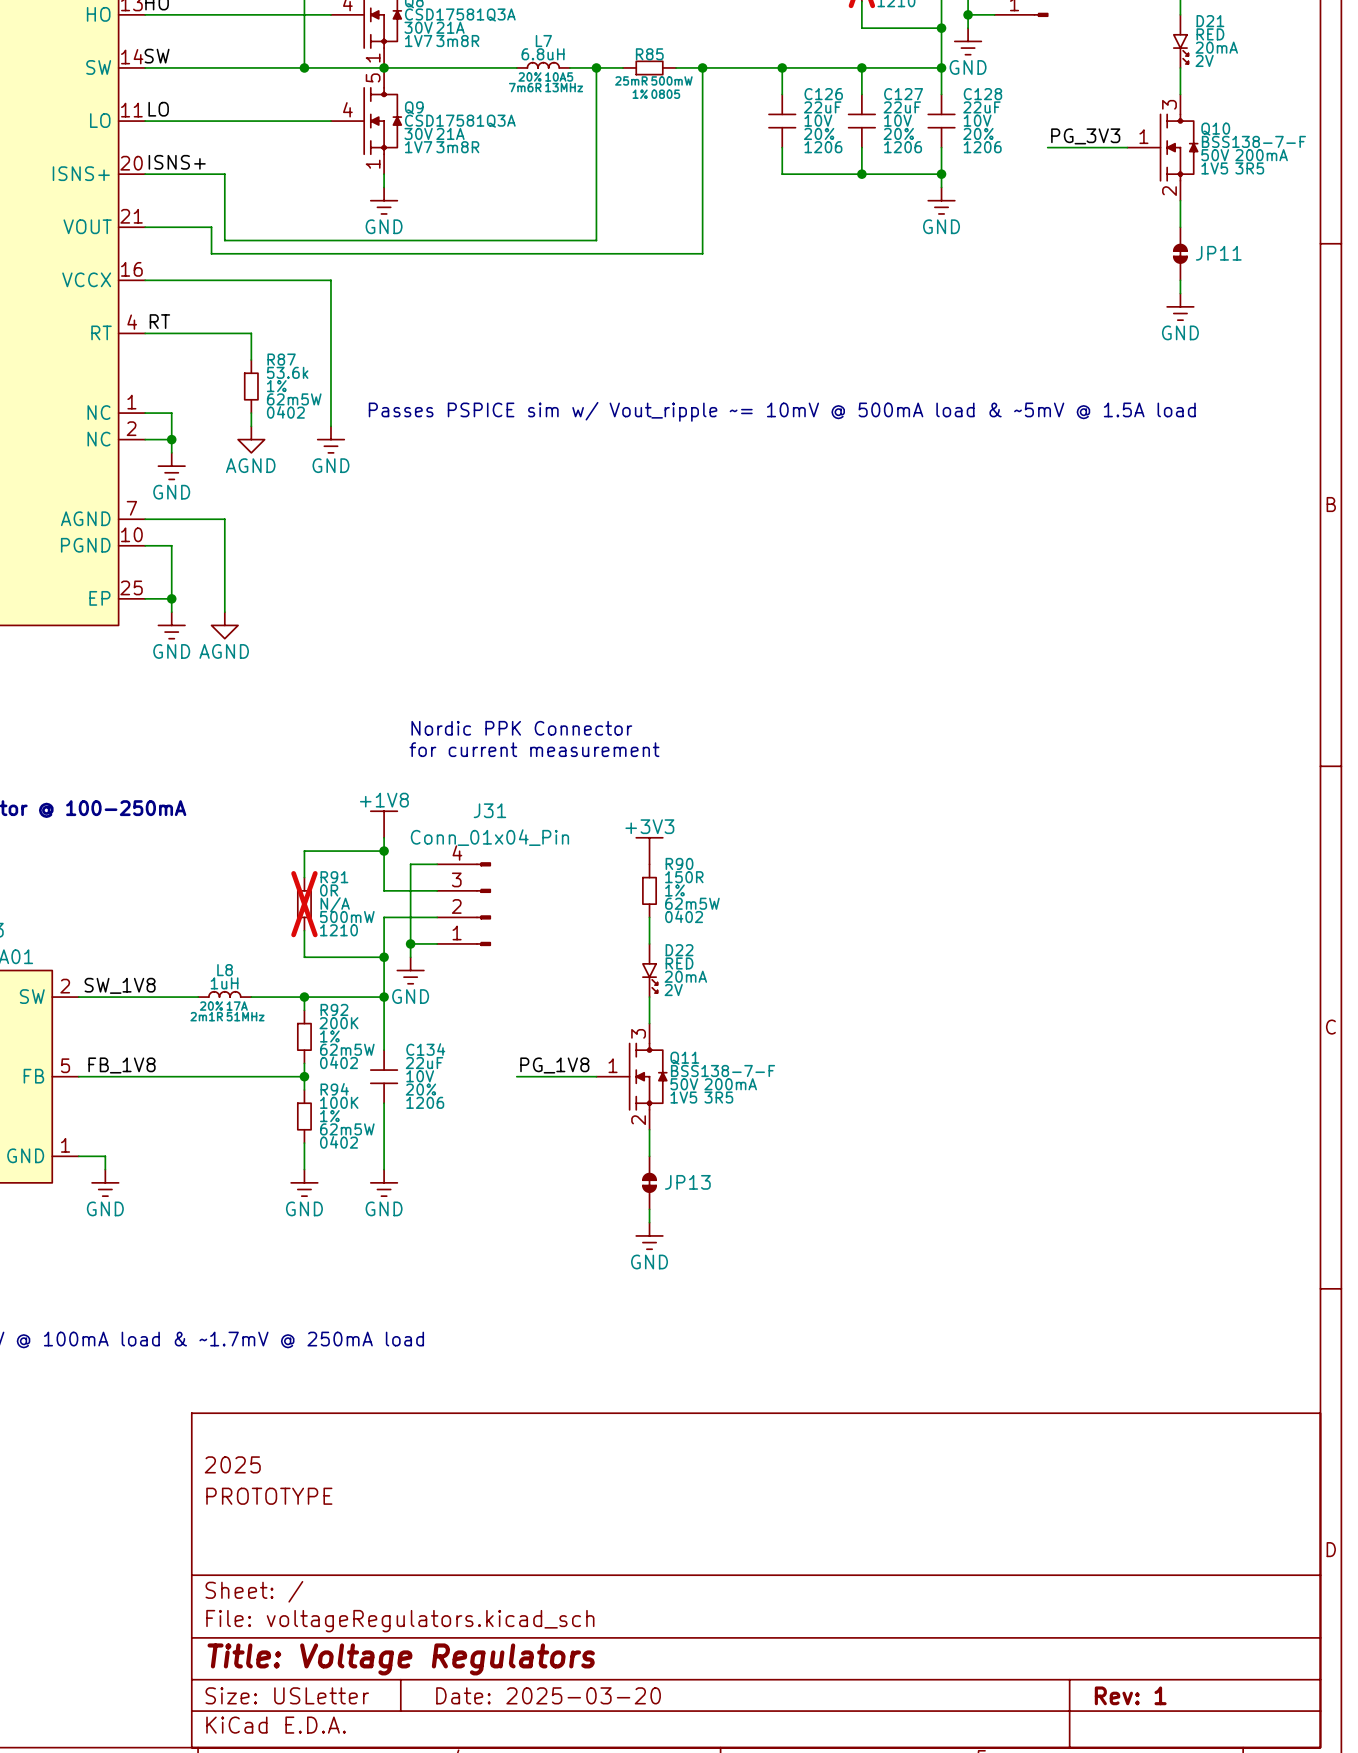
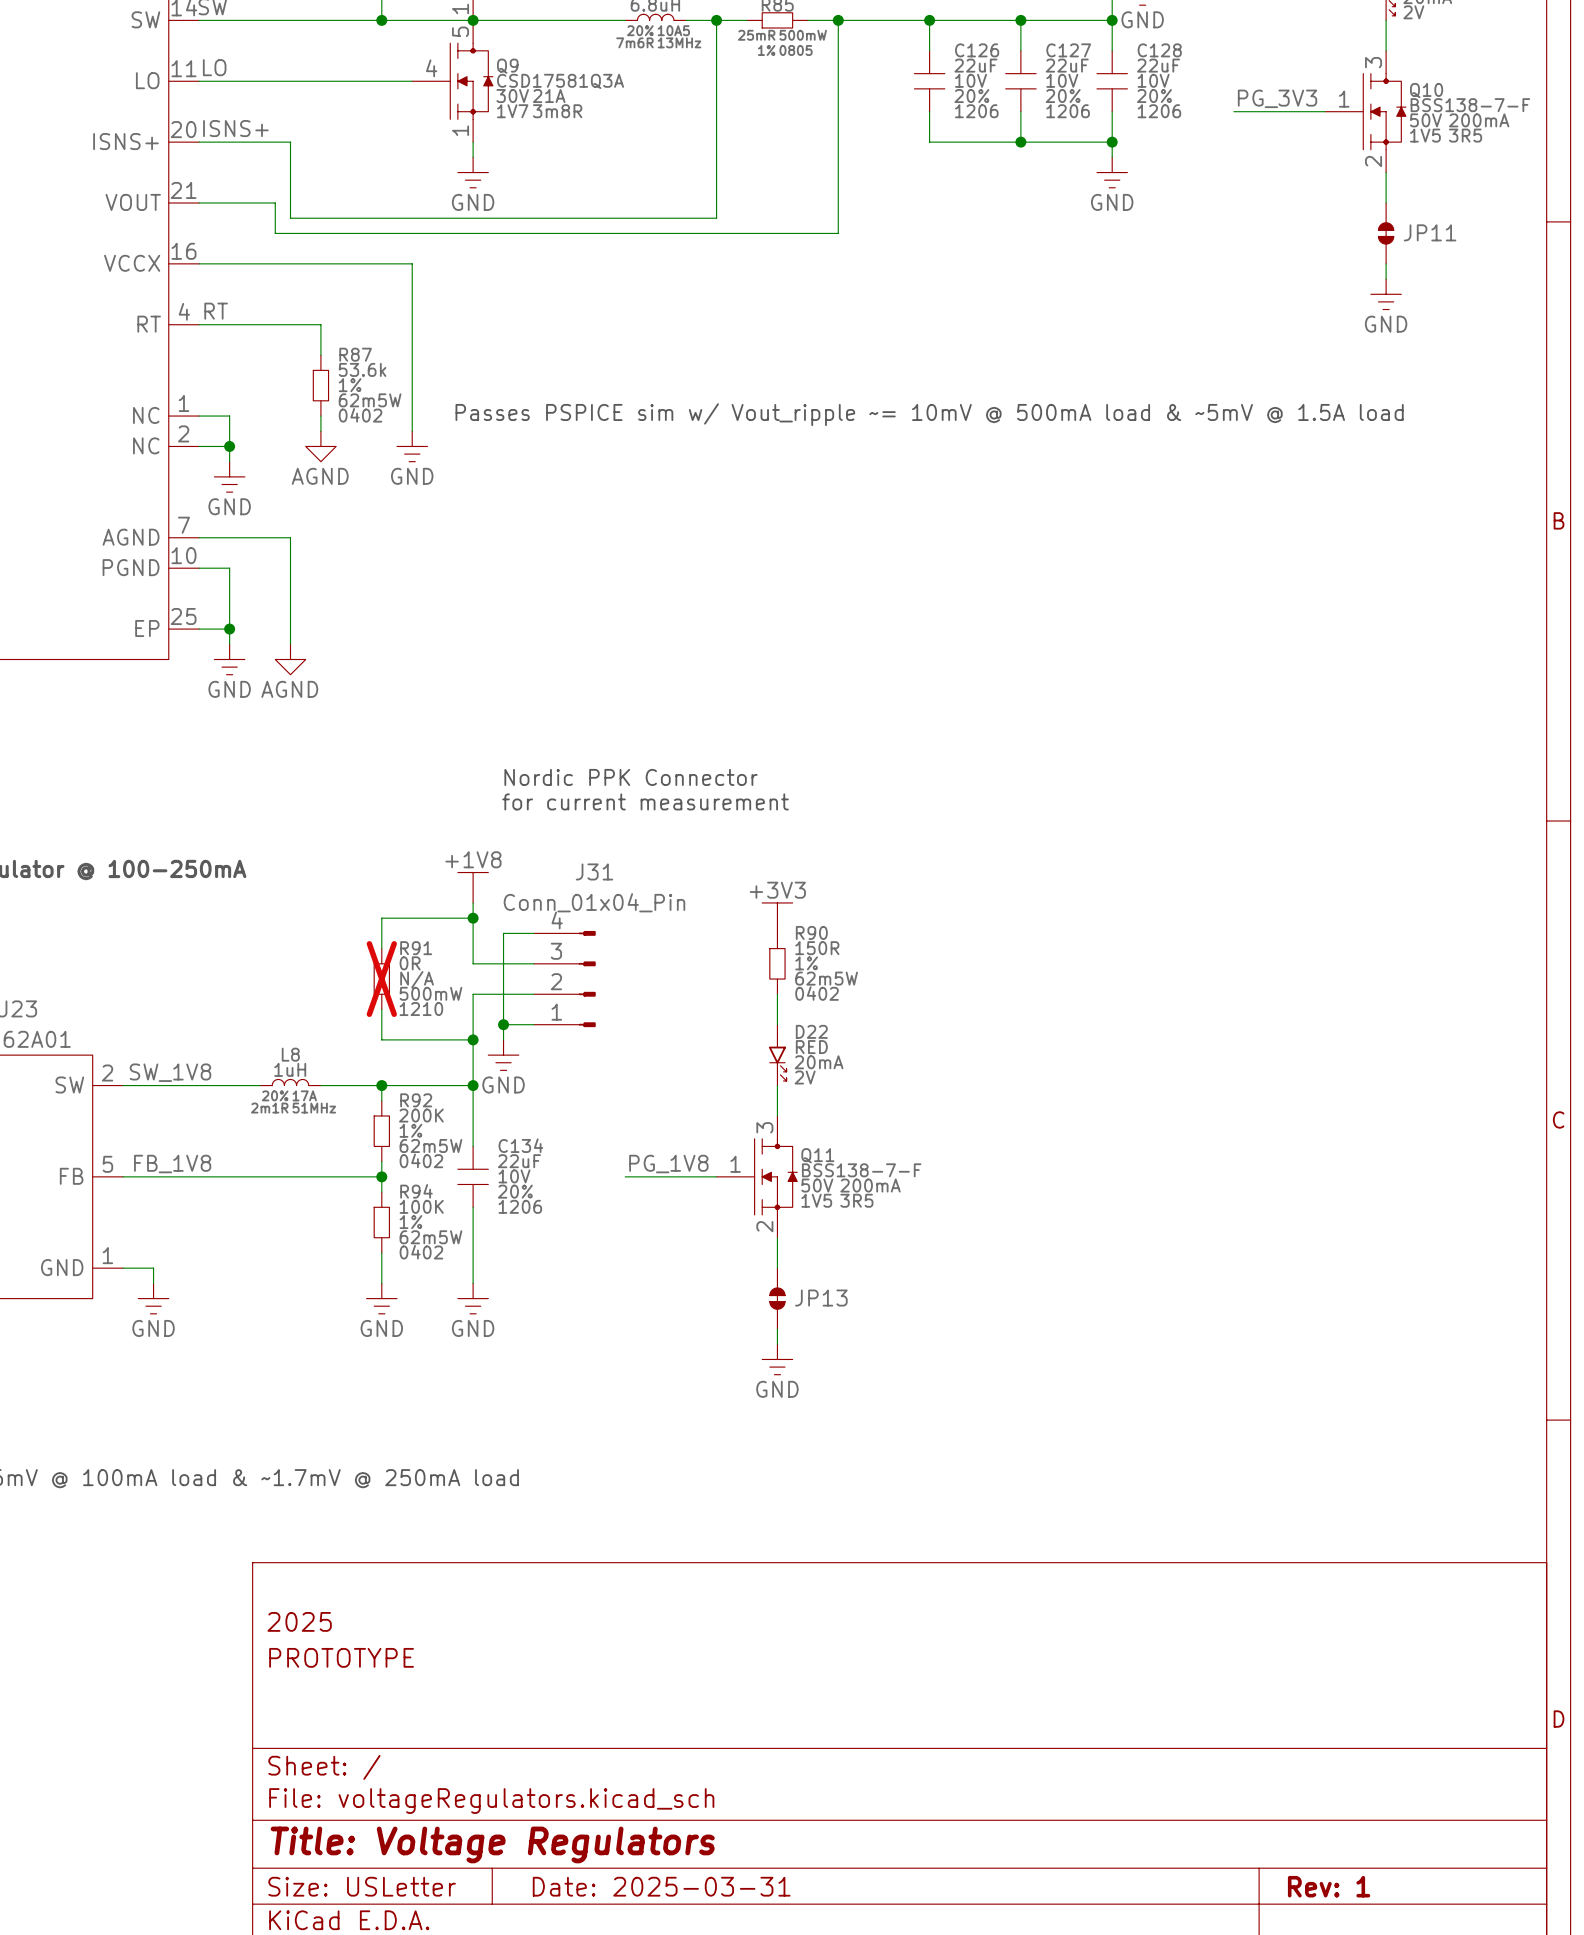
title block: Date: 2025-03-20 (548, 1695) -> Date: 2025-03-31 (661, 1886)

